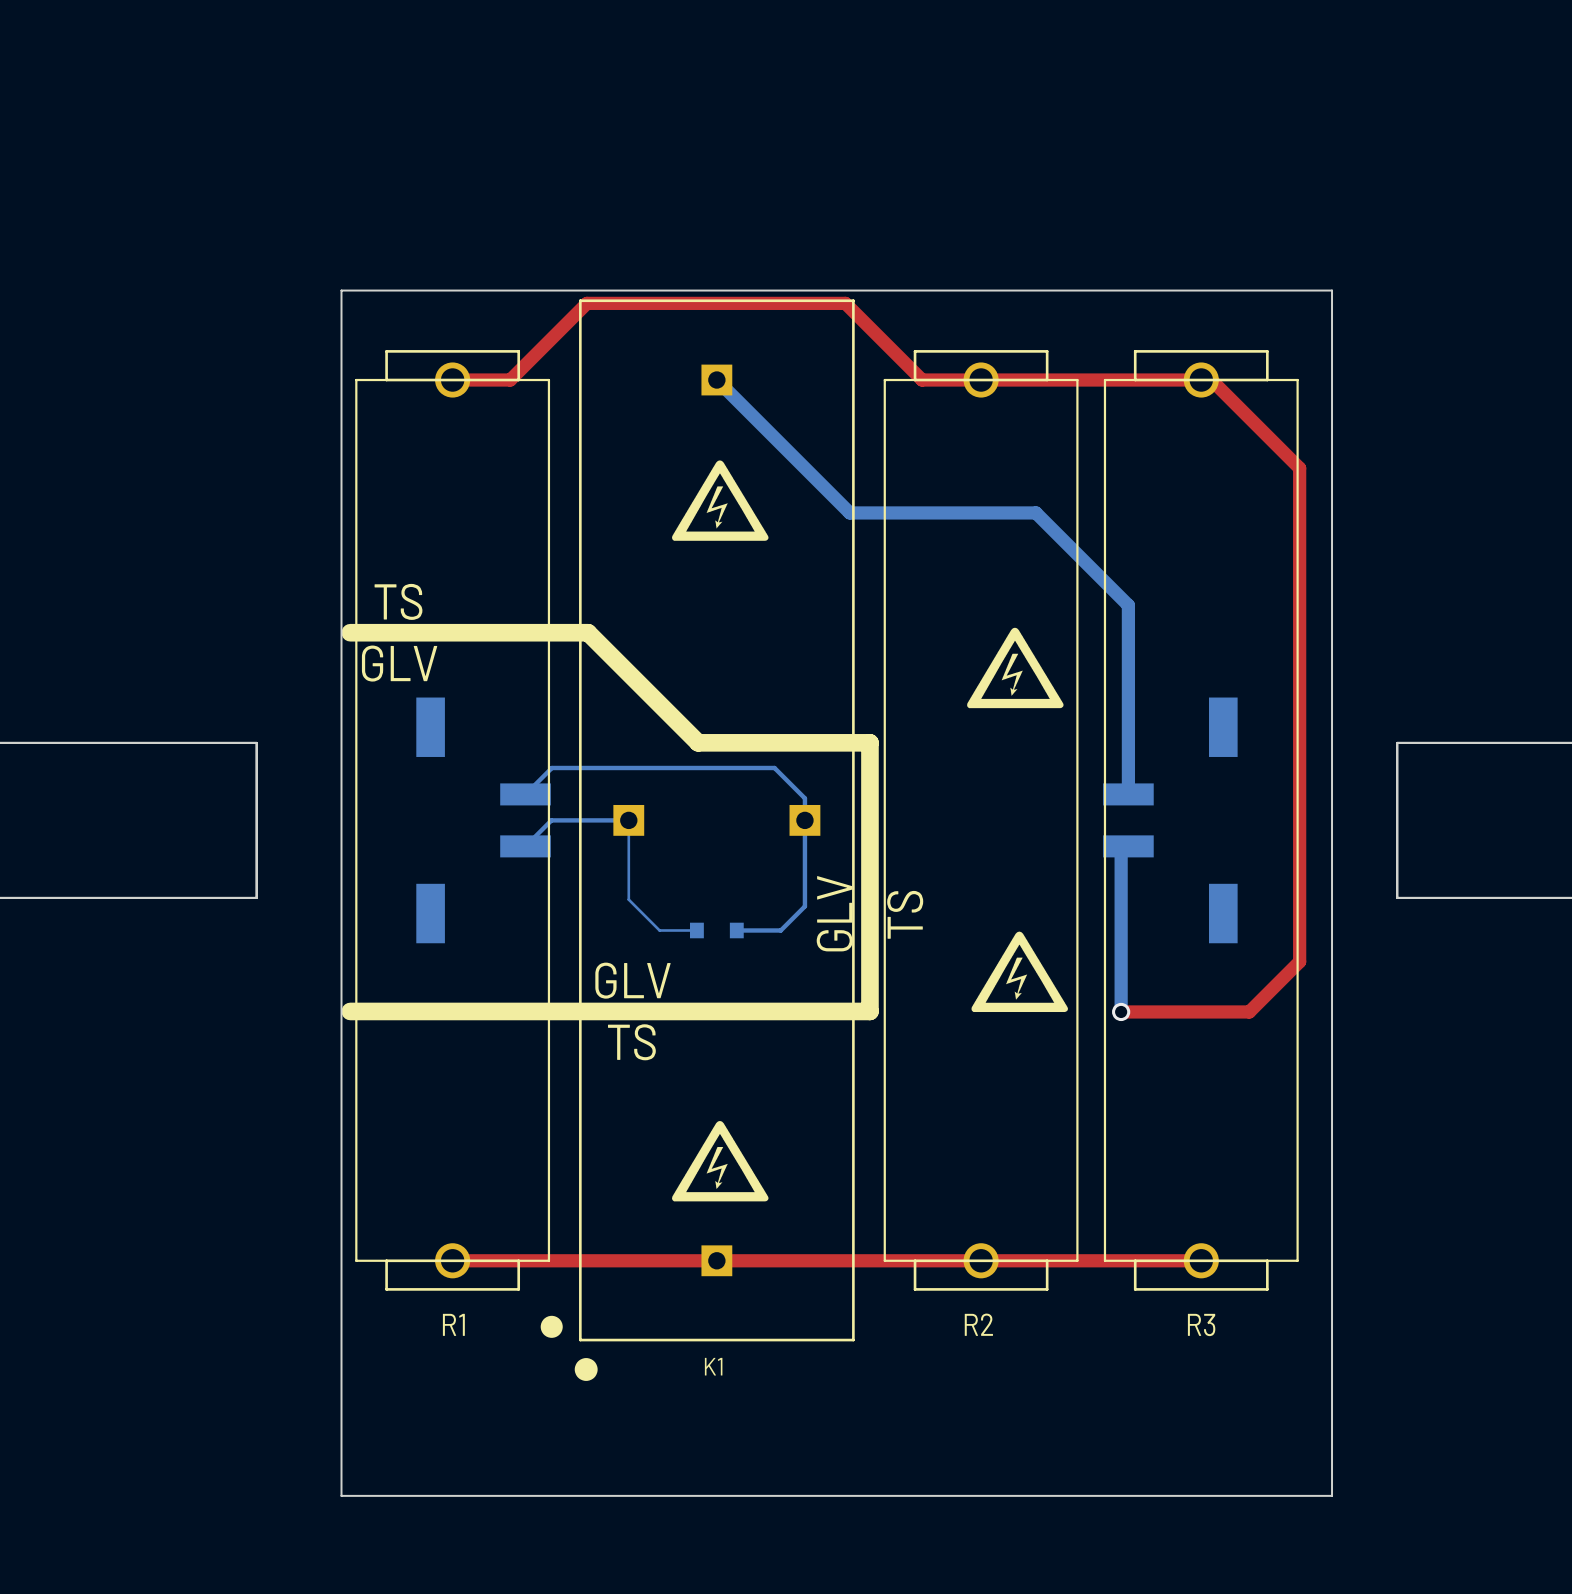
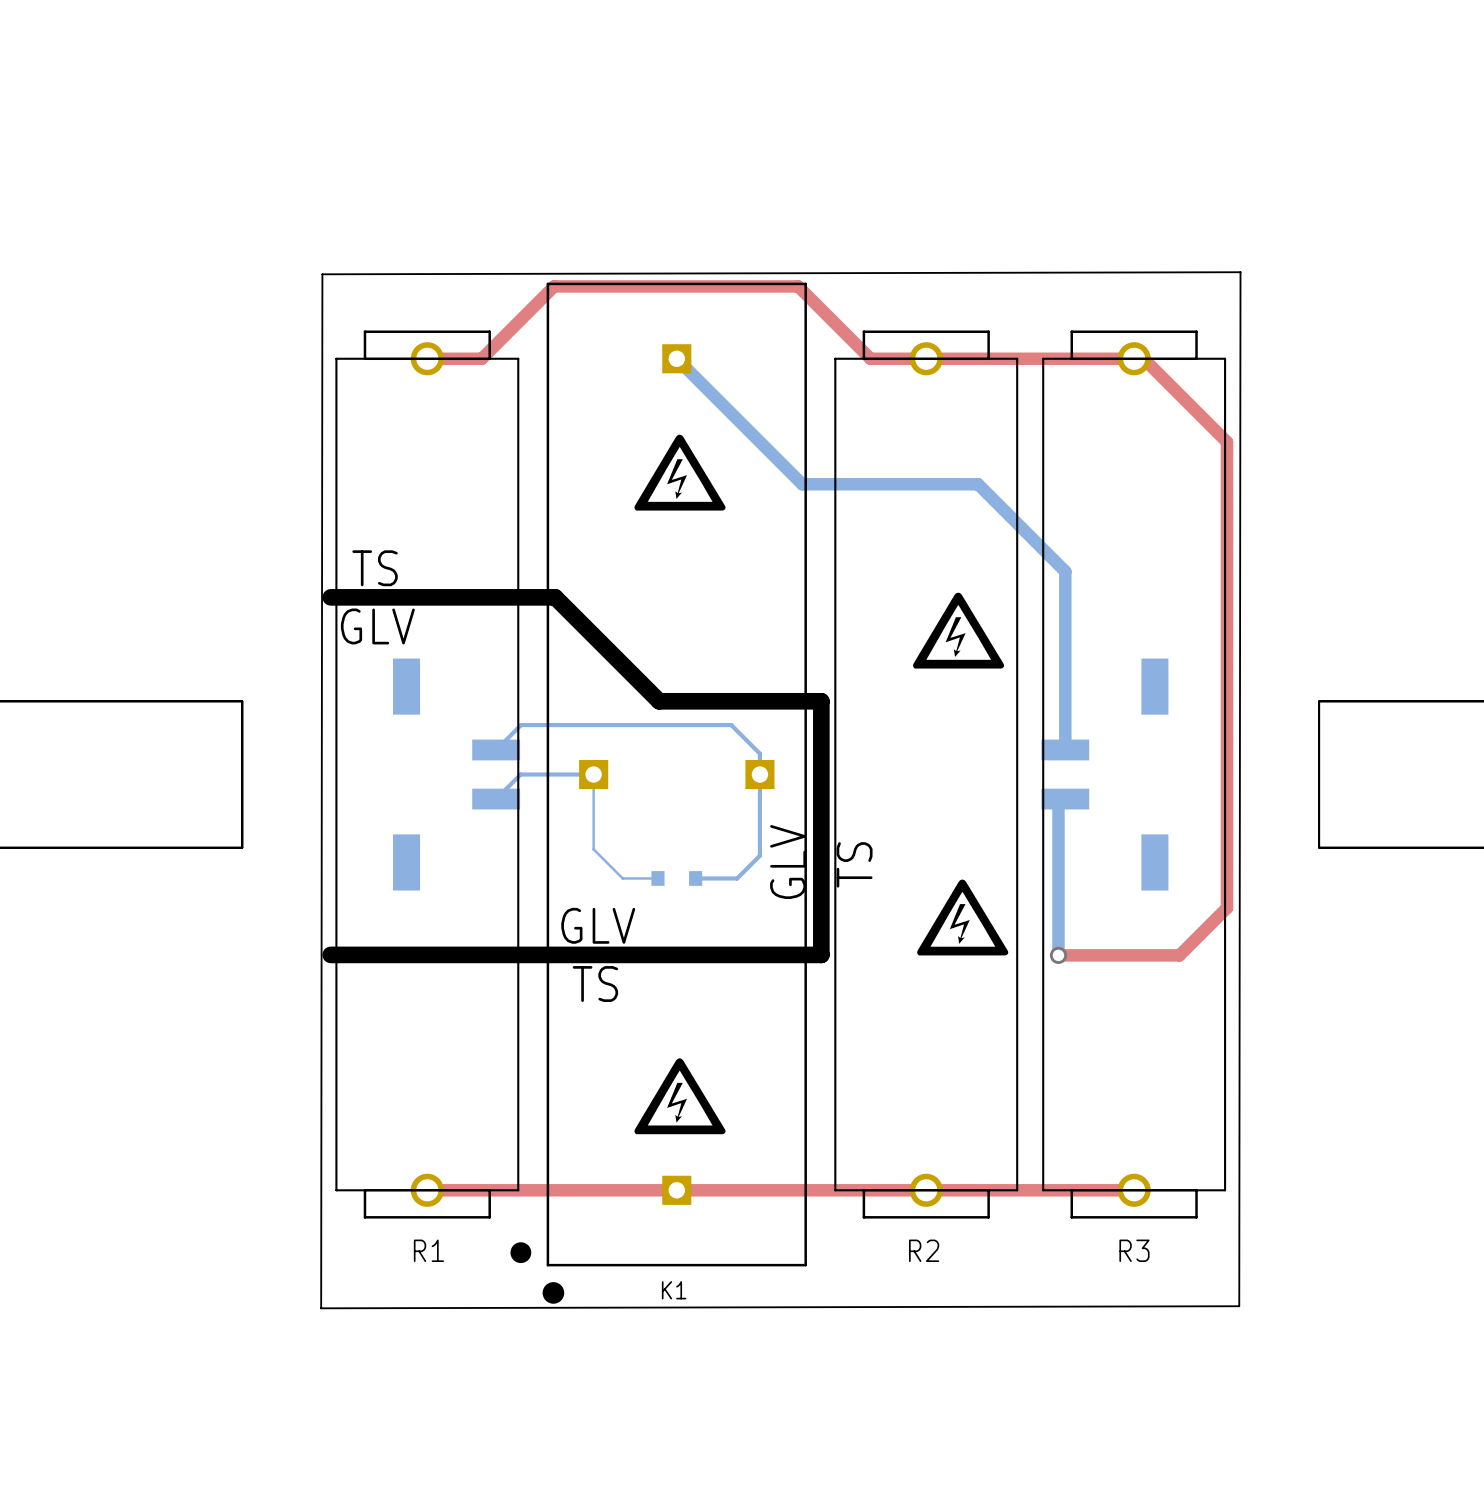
board edge: (341, 290) (1332, 290) (1332, 1495) (341, 1495) (341, 290) -> (1240, 272) (322, 274) (321, 1308) (1239, 1306) (1240, 272)

